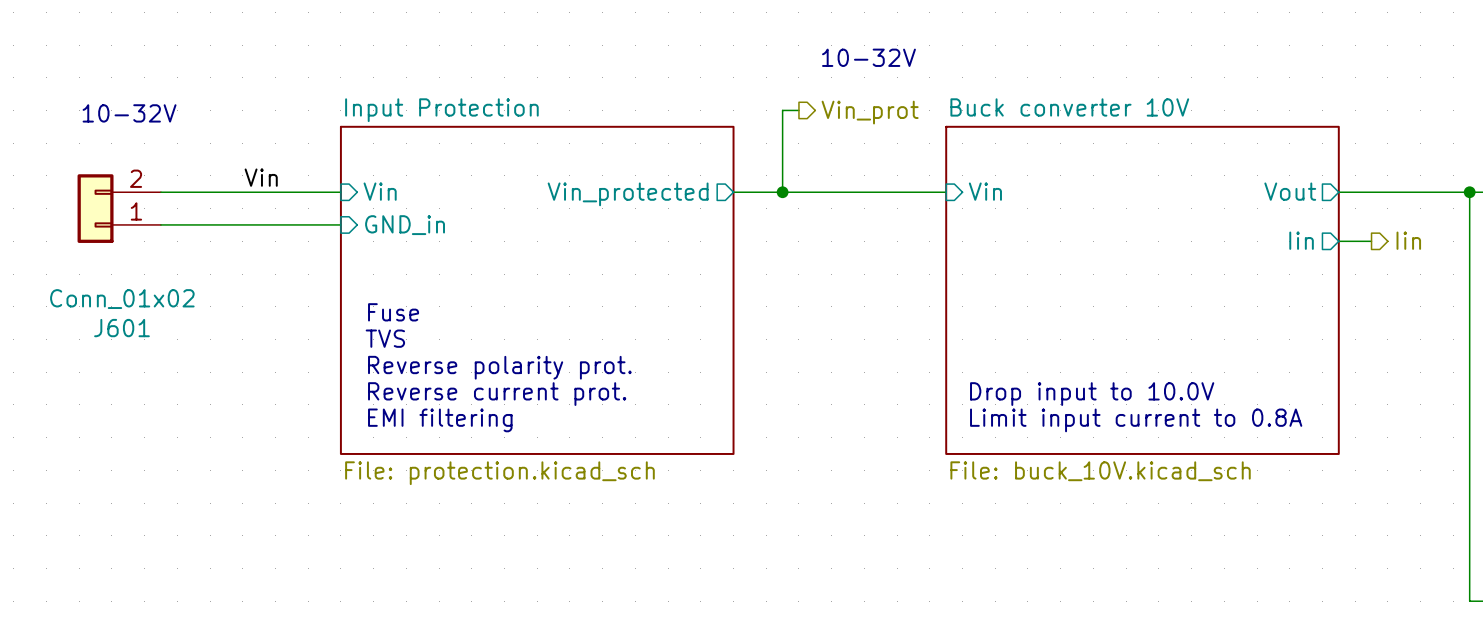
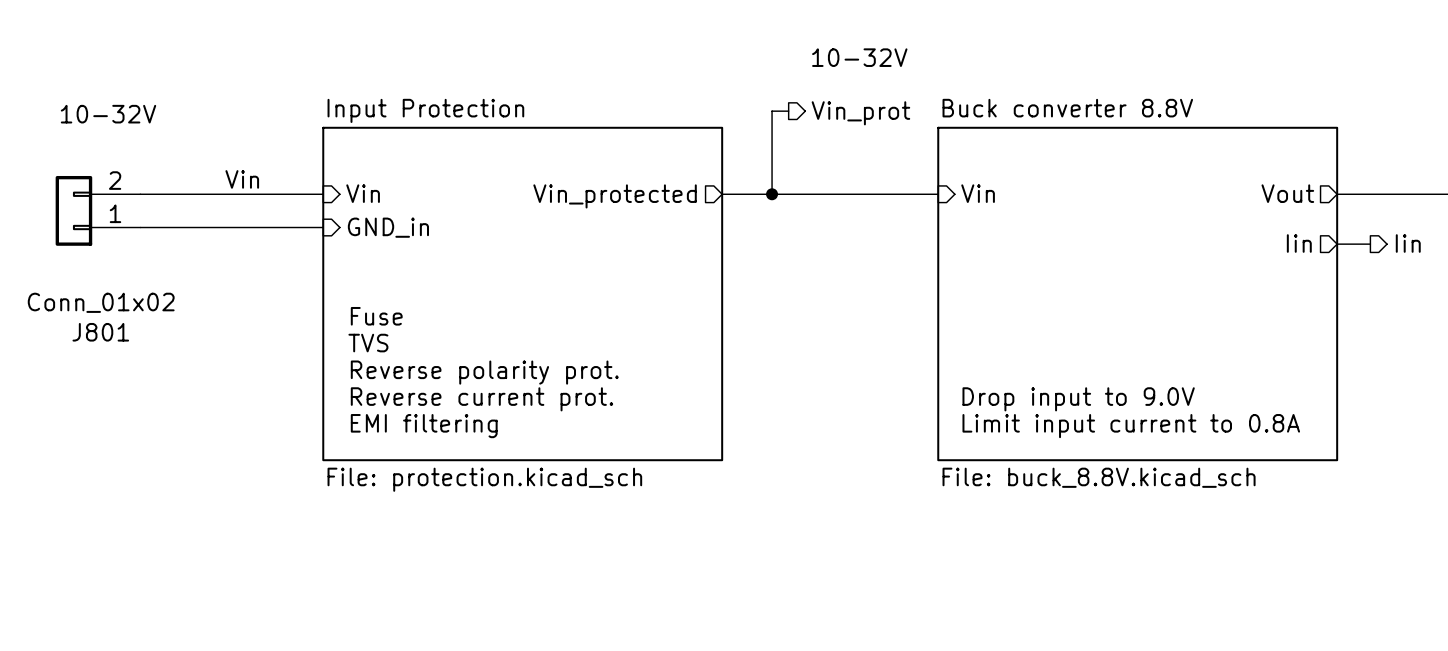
sheet Buck converter 10V name: Buck converter 10V (1069, 107) -> Buck converter 8.8V (1067, 108)
J601 name: J601 (121, 328) -> J801 (100, 332)
text: Drop input to 10.0V (1092, 394) -> Drop input to 9.0V (1078, 399)
sheet Buck converter 10V value: File: buck_10V.kicad_sch (1100, 471) -> File: buck_8.8V.kicad_sch (1099, 477)

